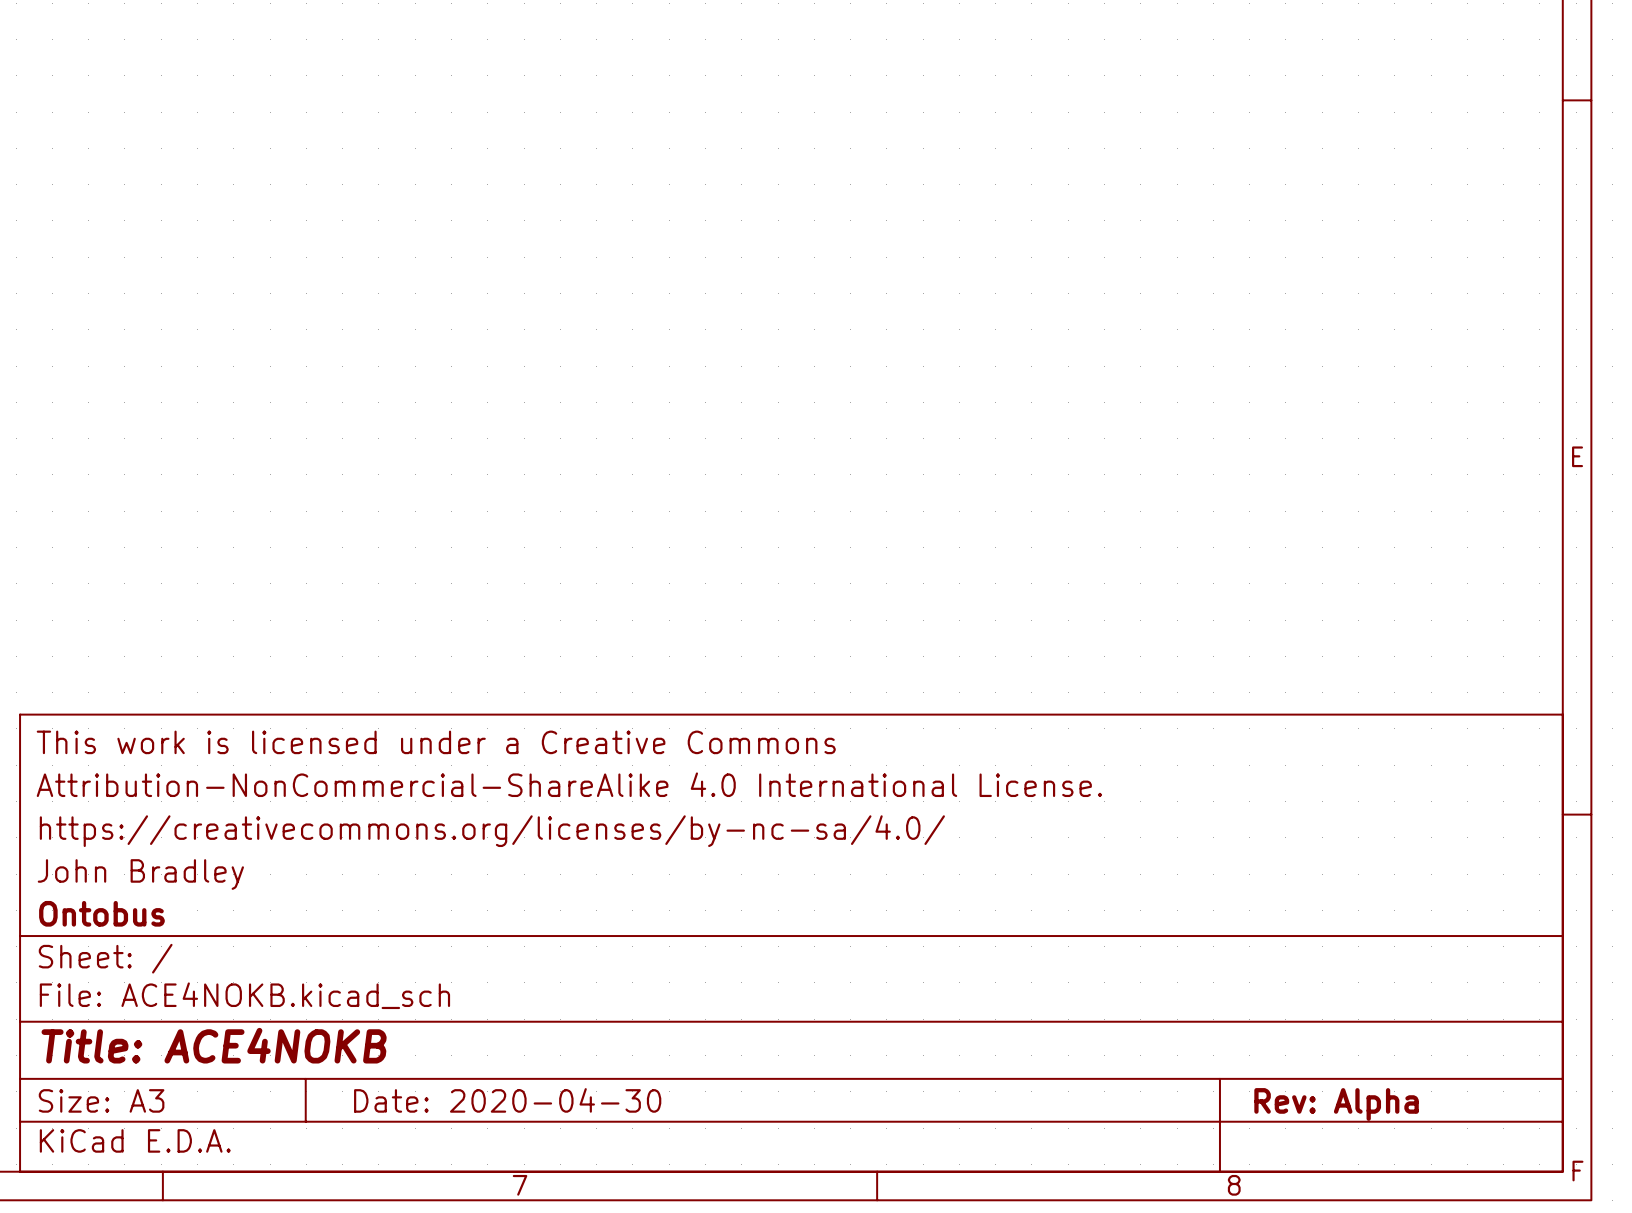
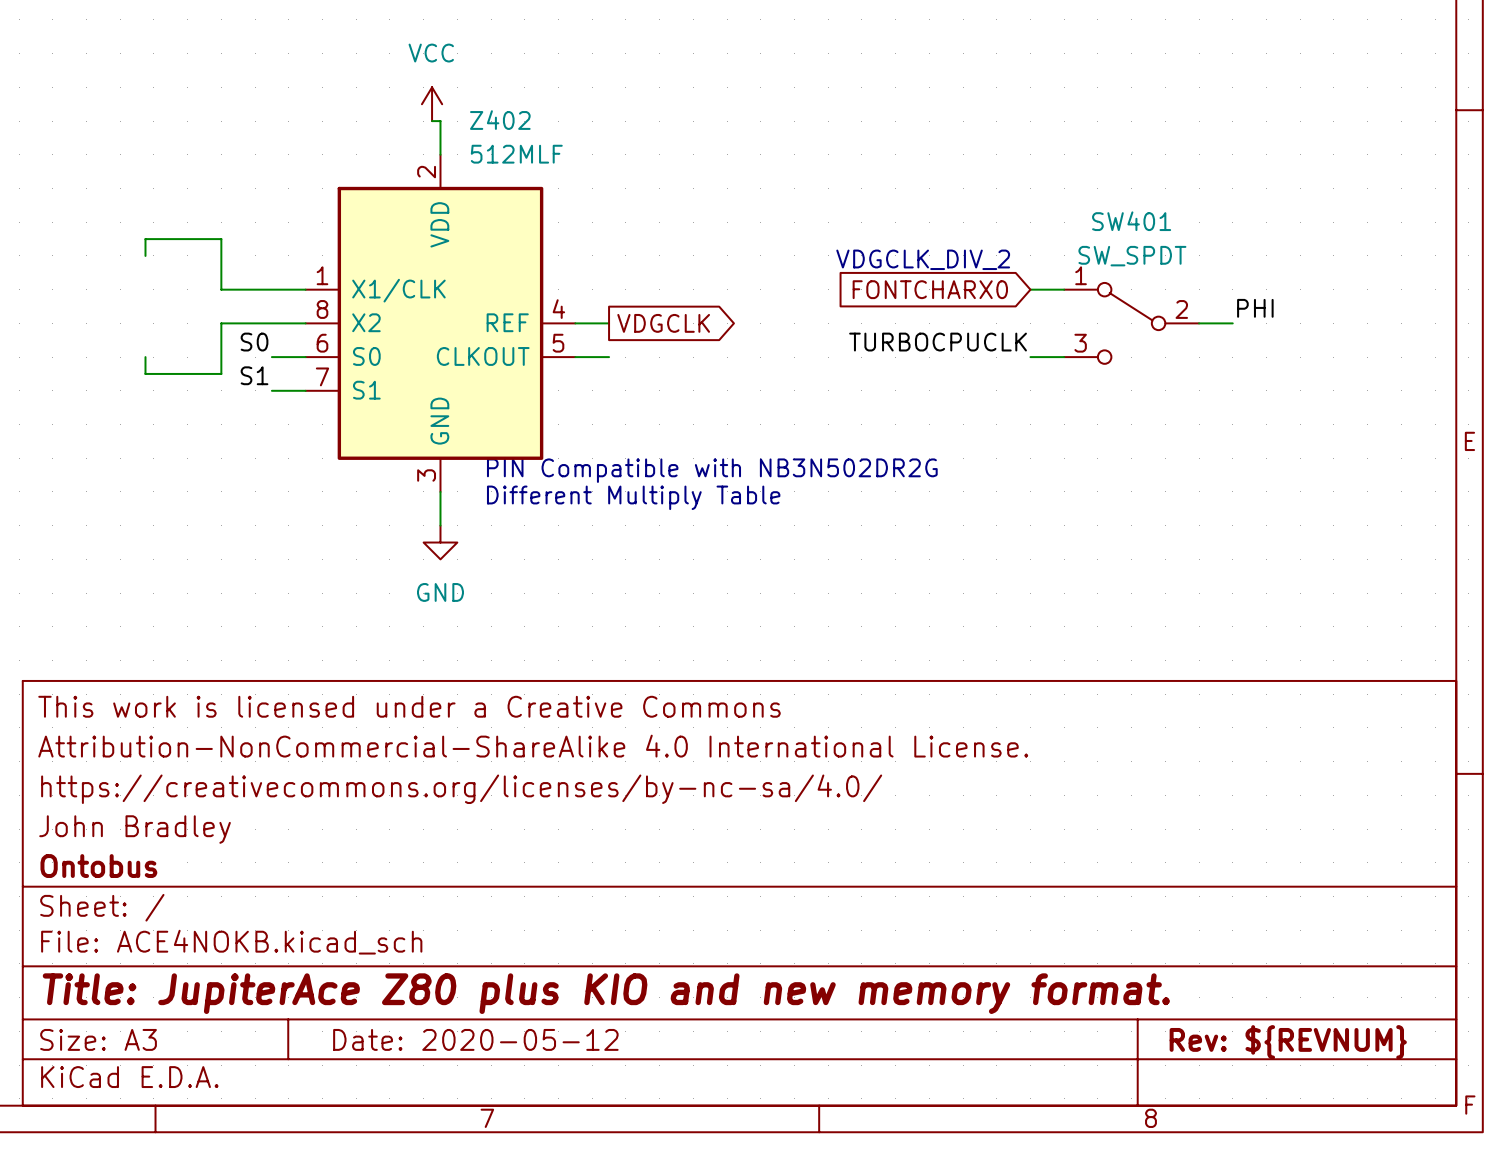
power symbol: none -> VCC (432, 104)
wire: none -> (432, 121) (440, 121) (440, 154)
wire: none -> (145, 255) (145, 239) (221, 239) (221, 289) (305, 289)
text: none -> VDGCLK_DIV_2 (923, 259)
global label: none -> FONTCHARX0 (930, 289)
wire: none -> (1030, 289) (1064, 289)
label: none -> PHI (1255, 308)
wire: none -> (305, 323) (221, 323) (221, 373) (145, 373) (145, 357)
Z402: none -> 512MLF (440, 323)
wire: none -> (575, 323) (609, 323)
global label: none -> VDGCLK (663, 323)
SW401: none -> SW_SPDT (1131, 323)
wire: none -> (1199, 323) (1232, 323)
label: none -> S0 (254, 342)
label: none -> TURBOCPUCLK (938, 342)
wire: none -> (271, 357) (305, 357)
wire: none -> (575, 357) (609, 357)
wire: none -> (1030, 357) (1064, 357)
label: none -> S1 (254, 375)
wire: none -> (271, 390) (305, 390)
text: none -> PIN Compatible with NB3N502DR2G (712, 470)
wire: none -> (440, 491) (440, 525)
text: none -> Different Multiply Table (633, 497)
power symbol: none -> GND (440, 542)
title block: Title: ACE4NOKB (214, 1045) -> Title: JupiterAce Z80 plus KIO and new memory format. (606, 993)
title block: Date: 2020-04-30 (507, 1100) -> Date: 2020-05-12 (475, 1039)
title block: Rev: Alpha (1336, 1104) -> Rev: ${REVNUM} (1288, 1042)

